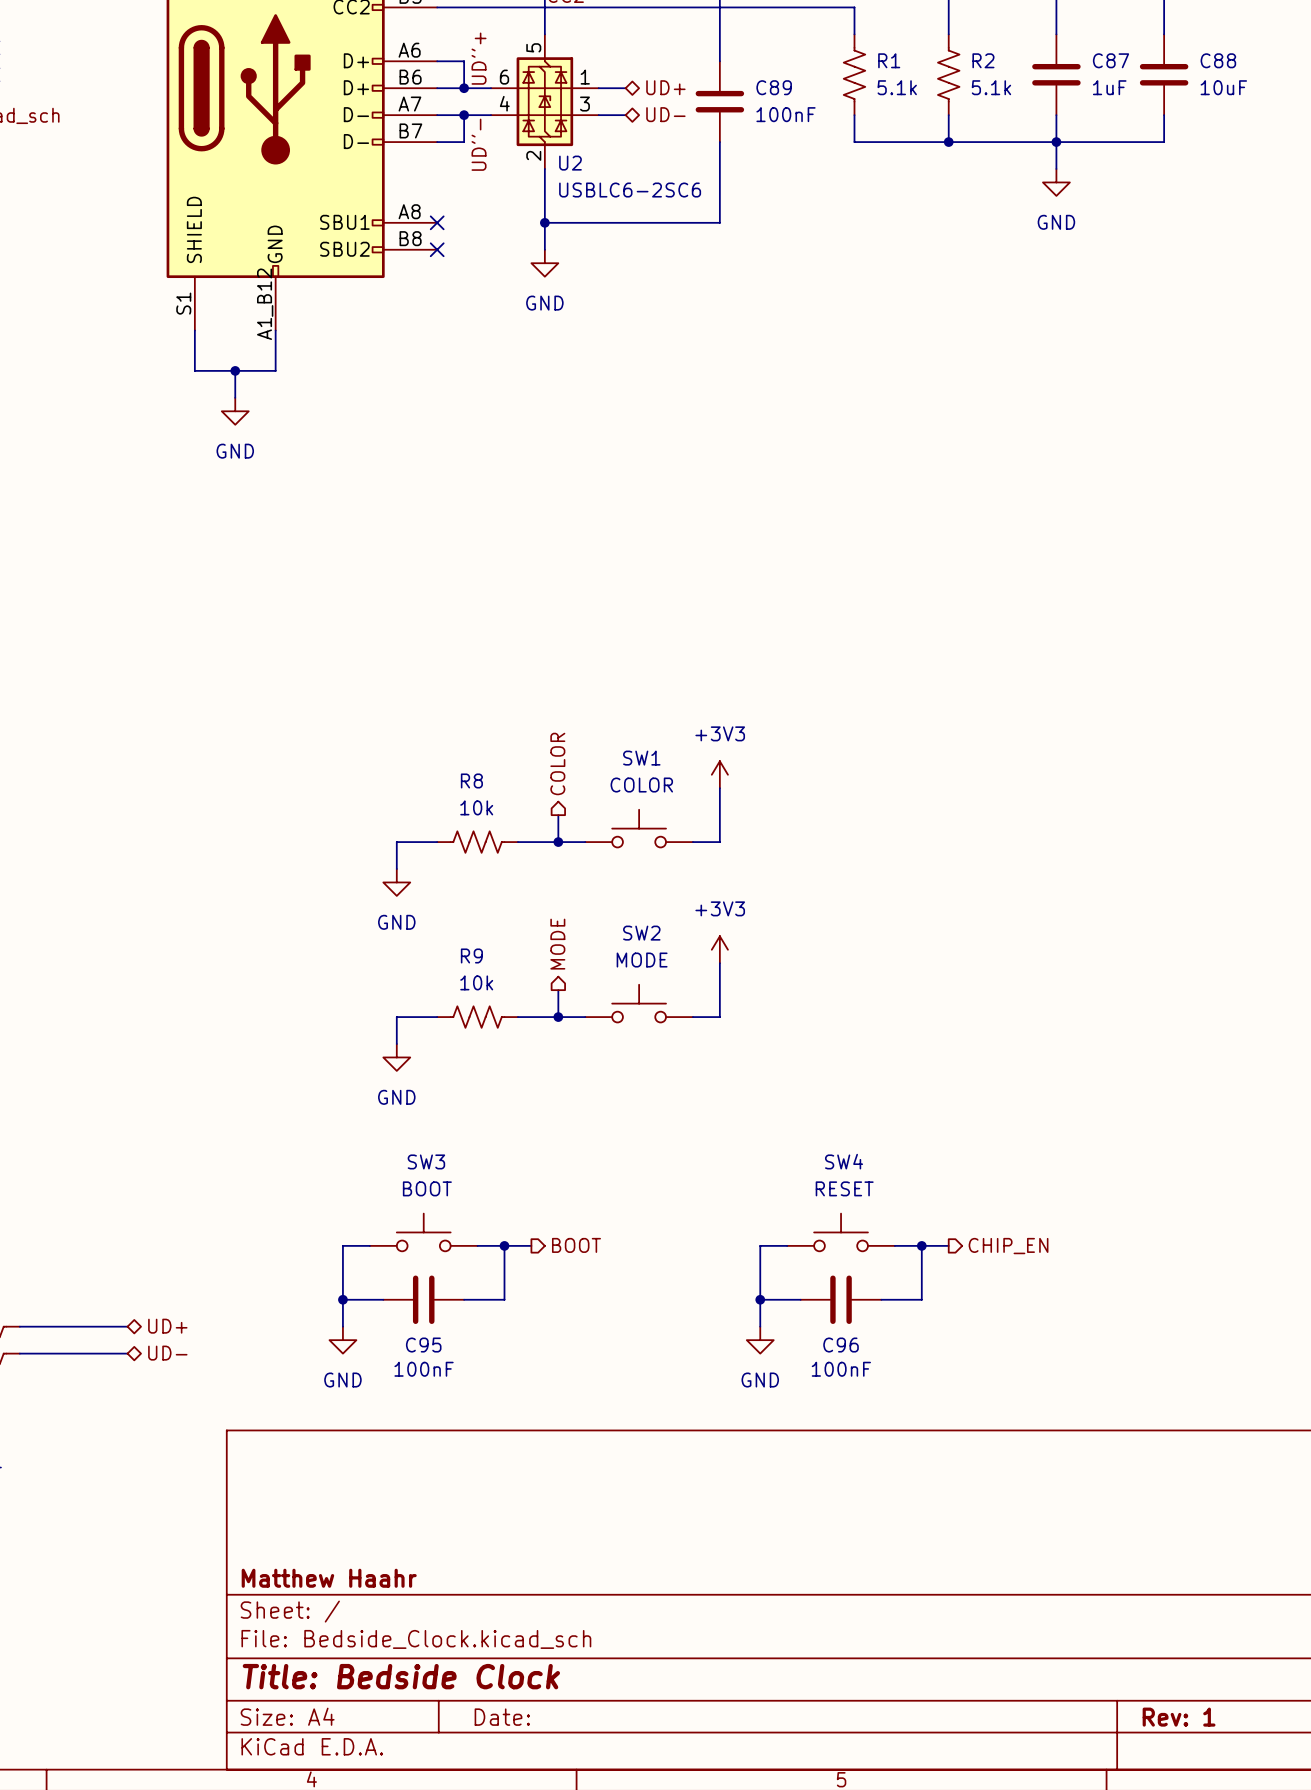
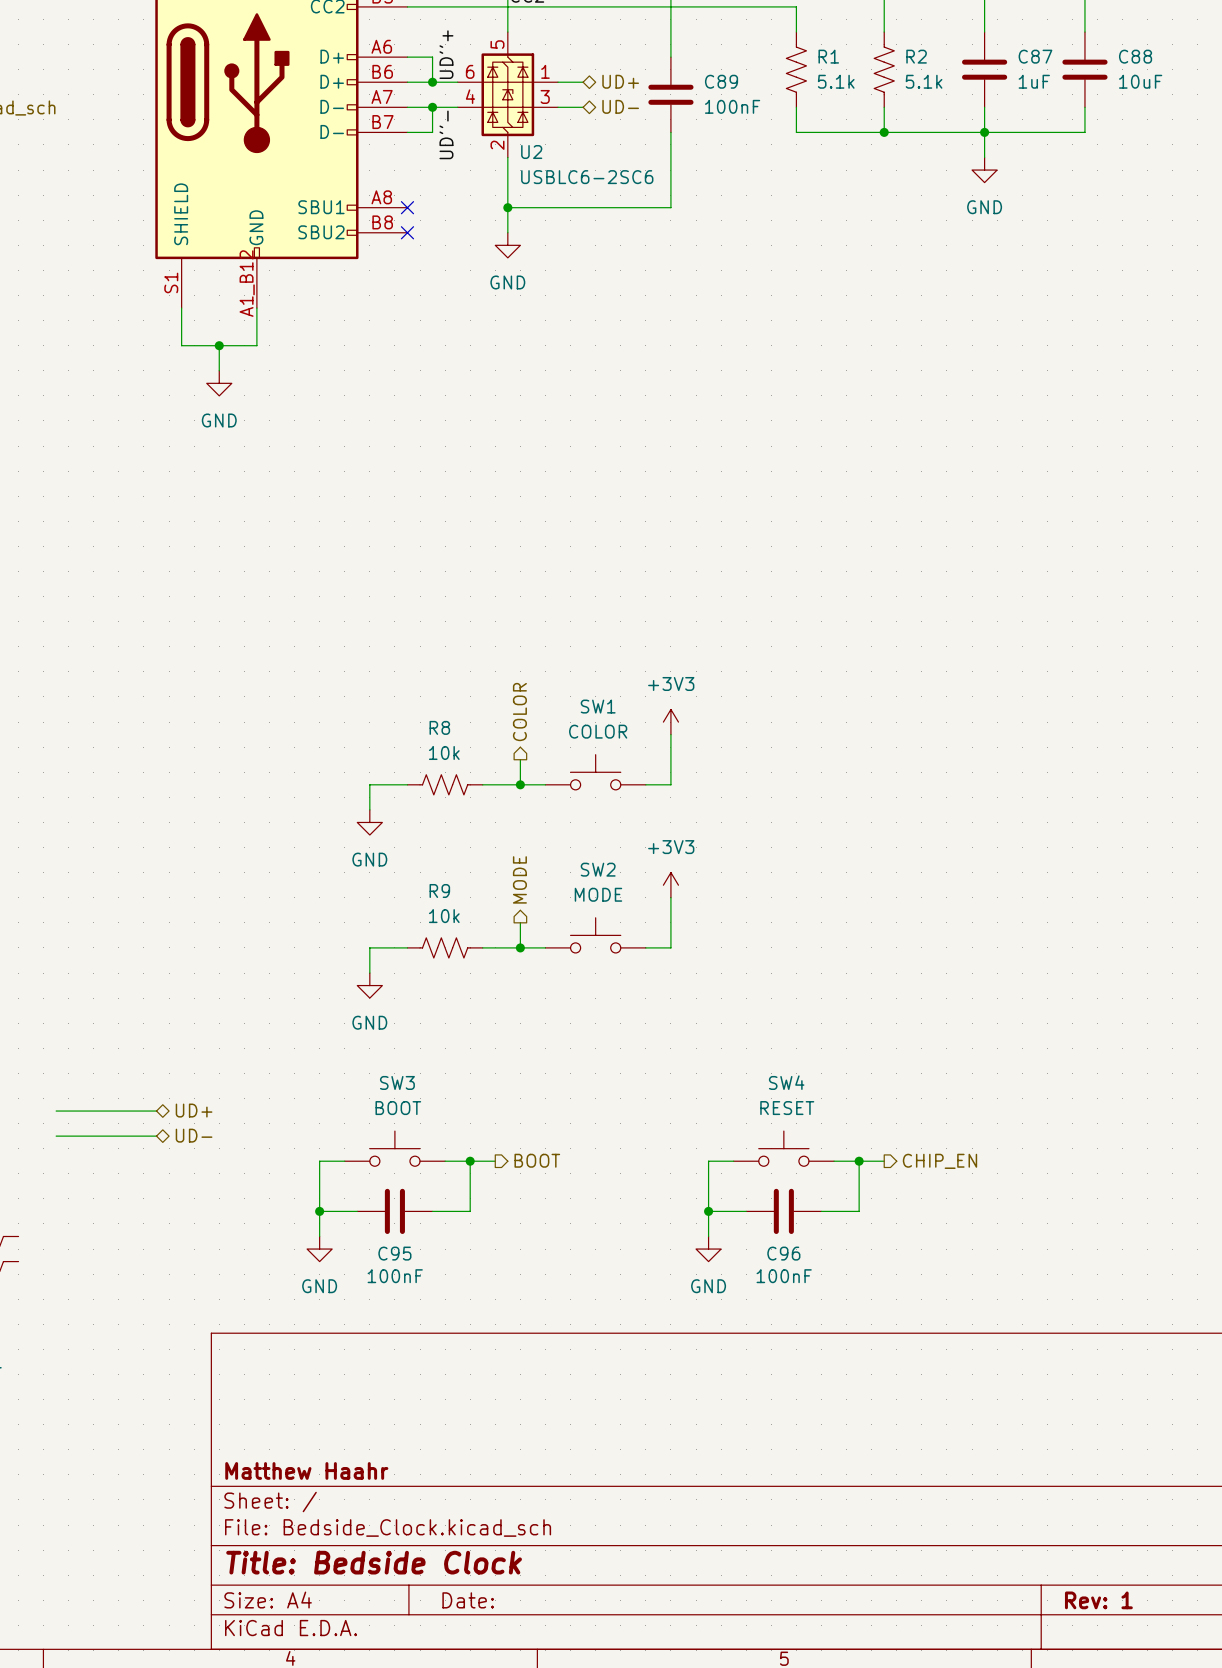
wire: (19, 1326) (127, 1326) -> (56, 1111) (156, 1111)
hierarchical label position: UD+ (167, 1326) -> UD+ (194, 1110)
wire: (19, 1353) (127, 1353) -> (56, 1136) (156, 1136)
hierarchical label position: UD- (167, 1353) -> UD- (194, 1135)

